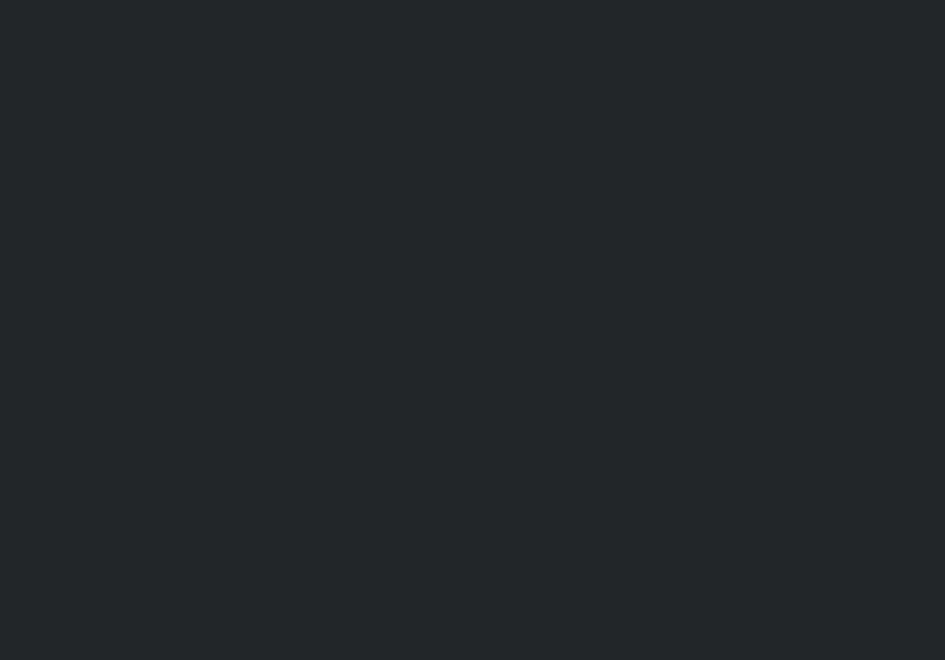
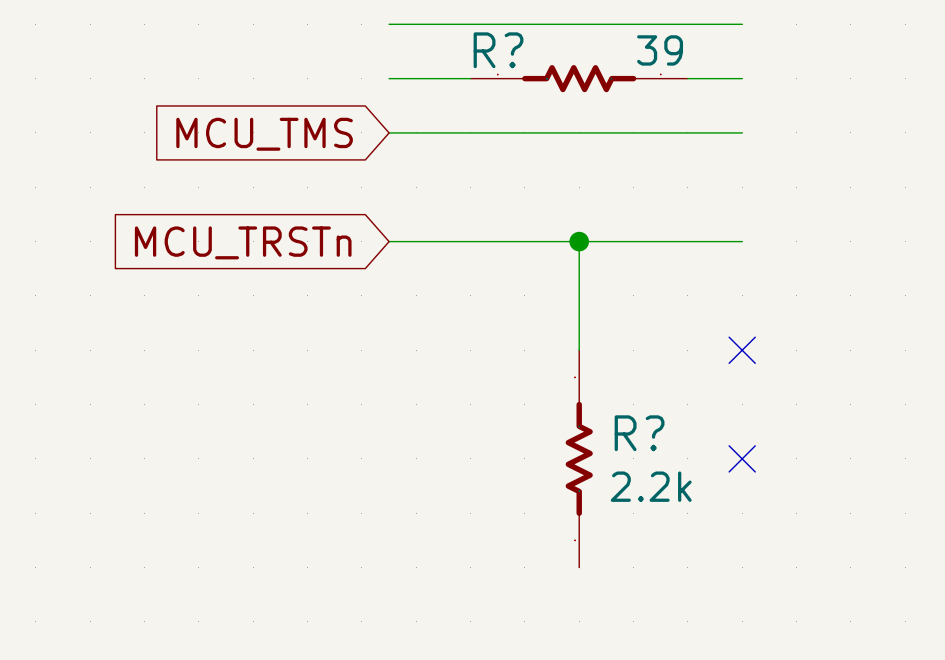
wire: none -> (389, 24) (742, 24)
wire: none -> (389, 78) (470, 78)
R?: none -> 39 (579, 78)
wire: none -> (687, 78) (742, 78)
wire: none -> (389, 132) (742, 132)
global label: none -> MCU_TMS (264, 134)
wire: none -> (389, 241) (742, 241)
wire: none -> (579, 241) (579, 350)
junction: none -> (579, 241)
global label: none -> MCU_TRSTn (243, 242)
no-connect mark: none -> (742, 350)
R?: none -> 2.2k (579, 458)
no-connect mark: none -> (742, 458)

